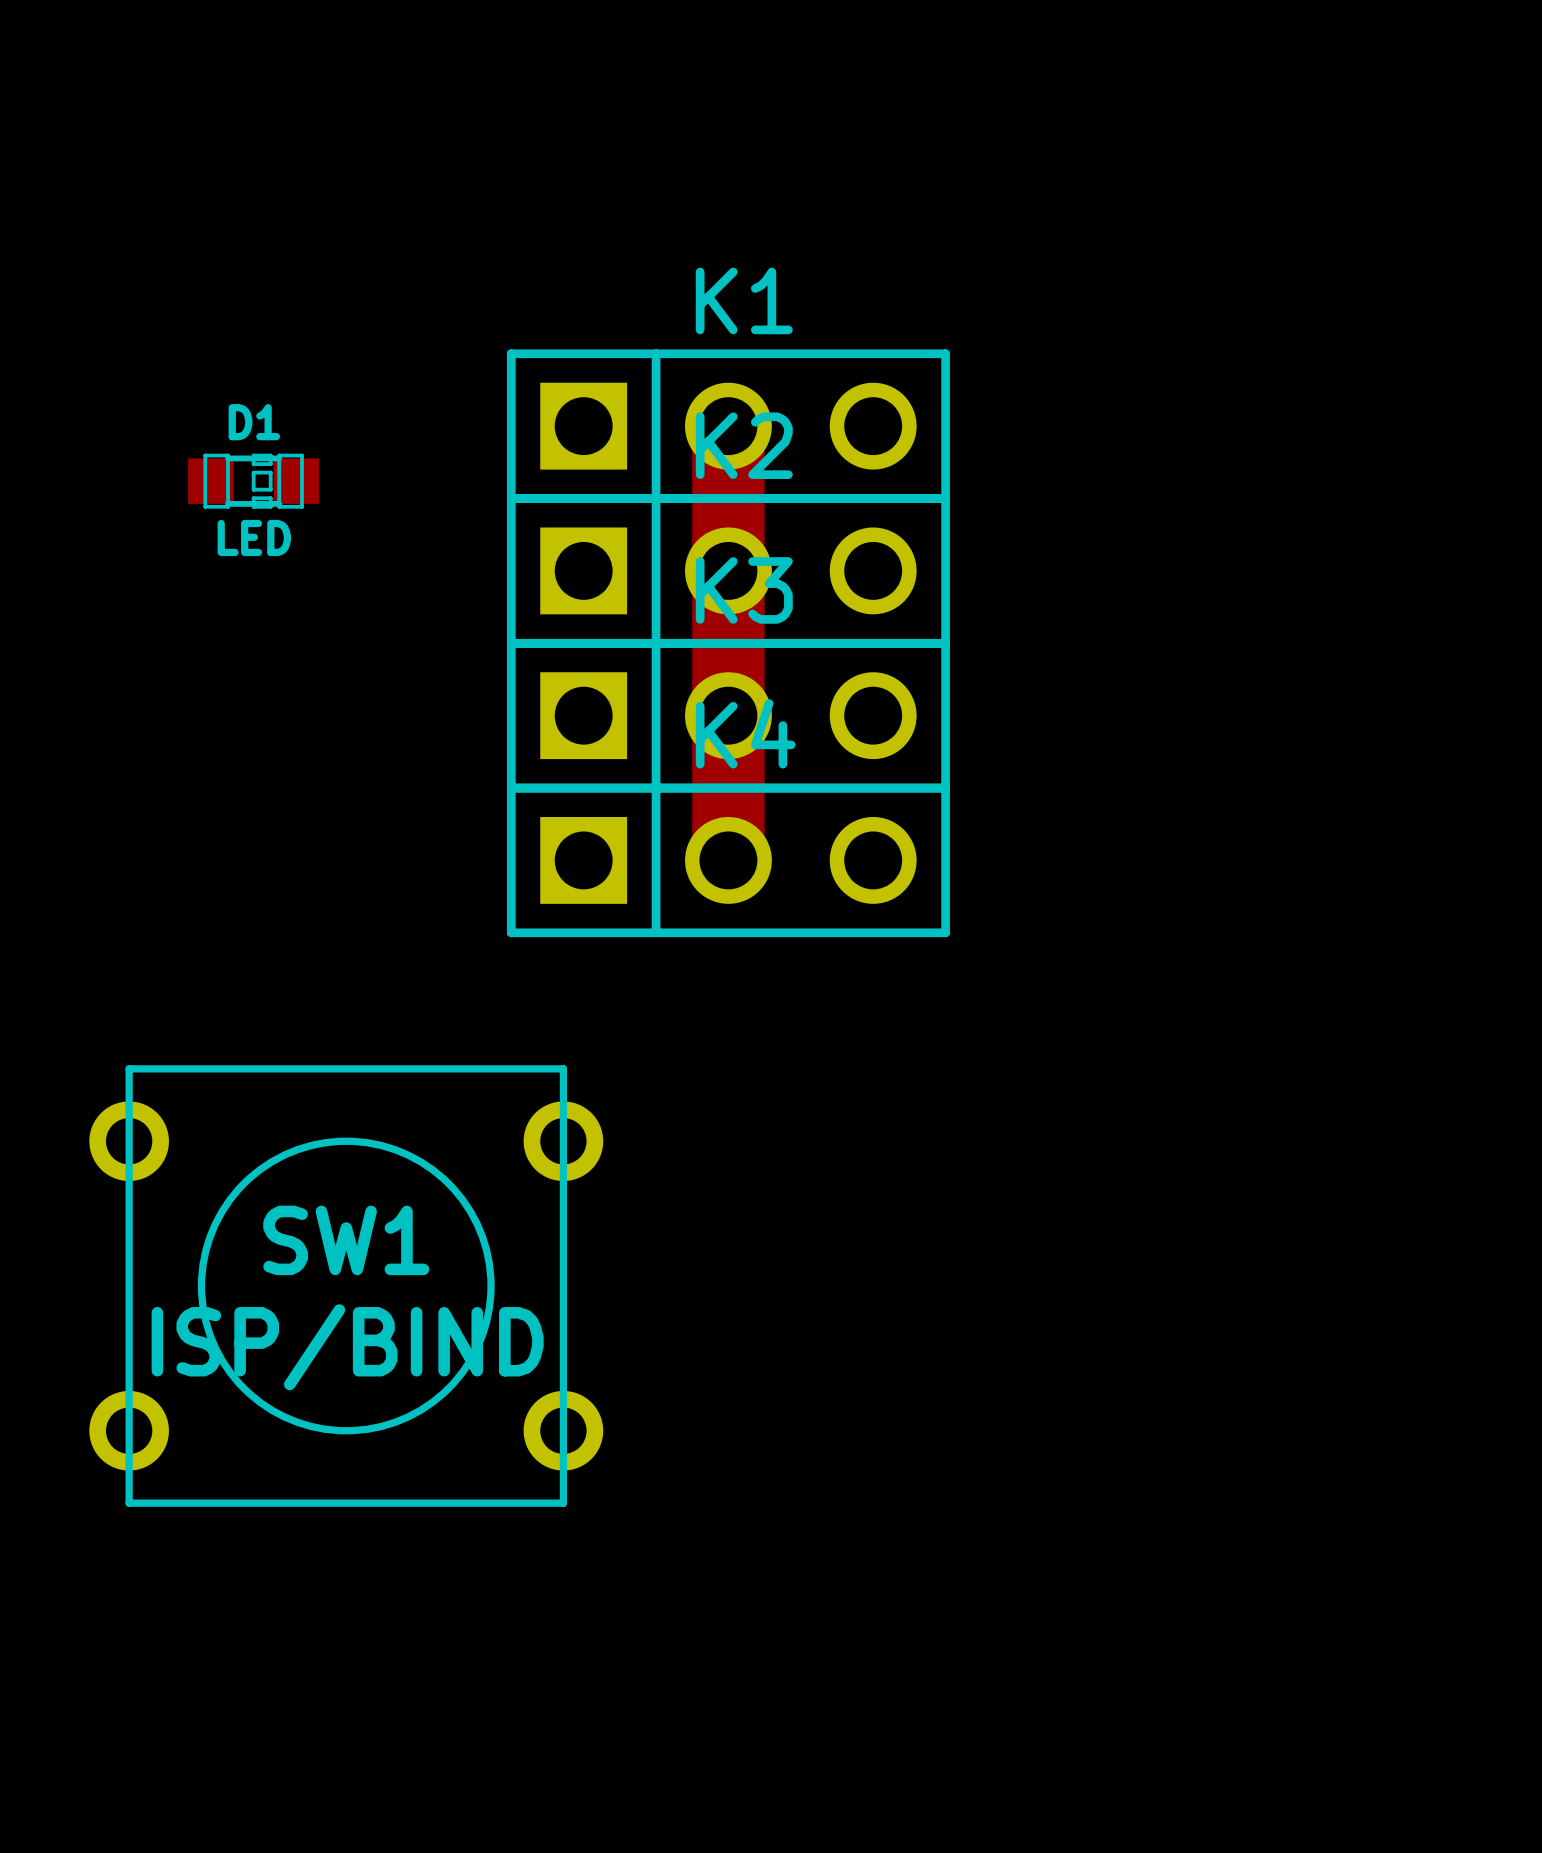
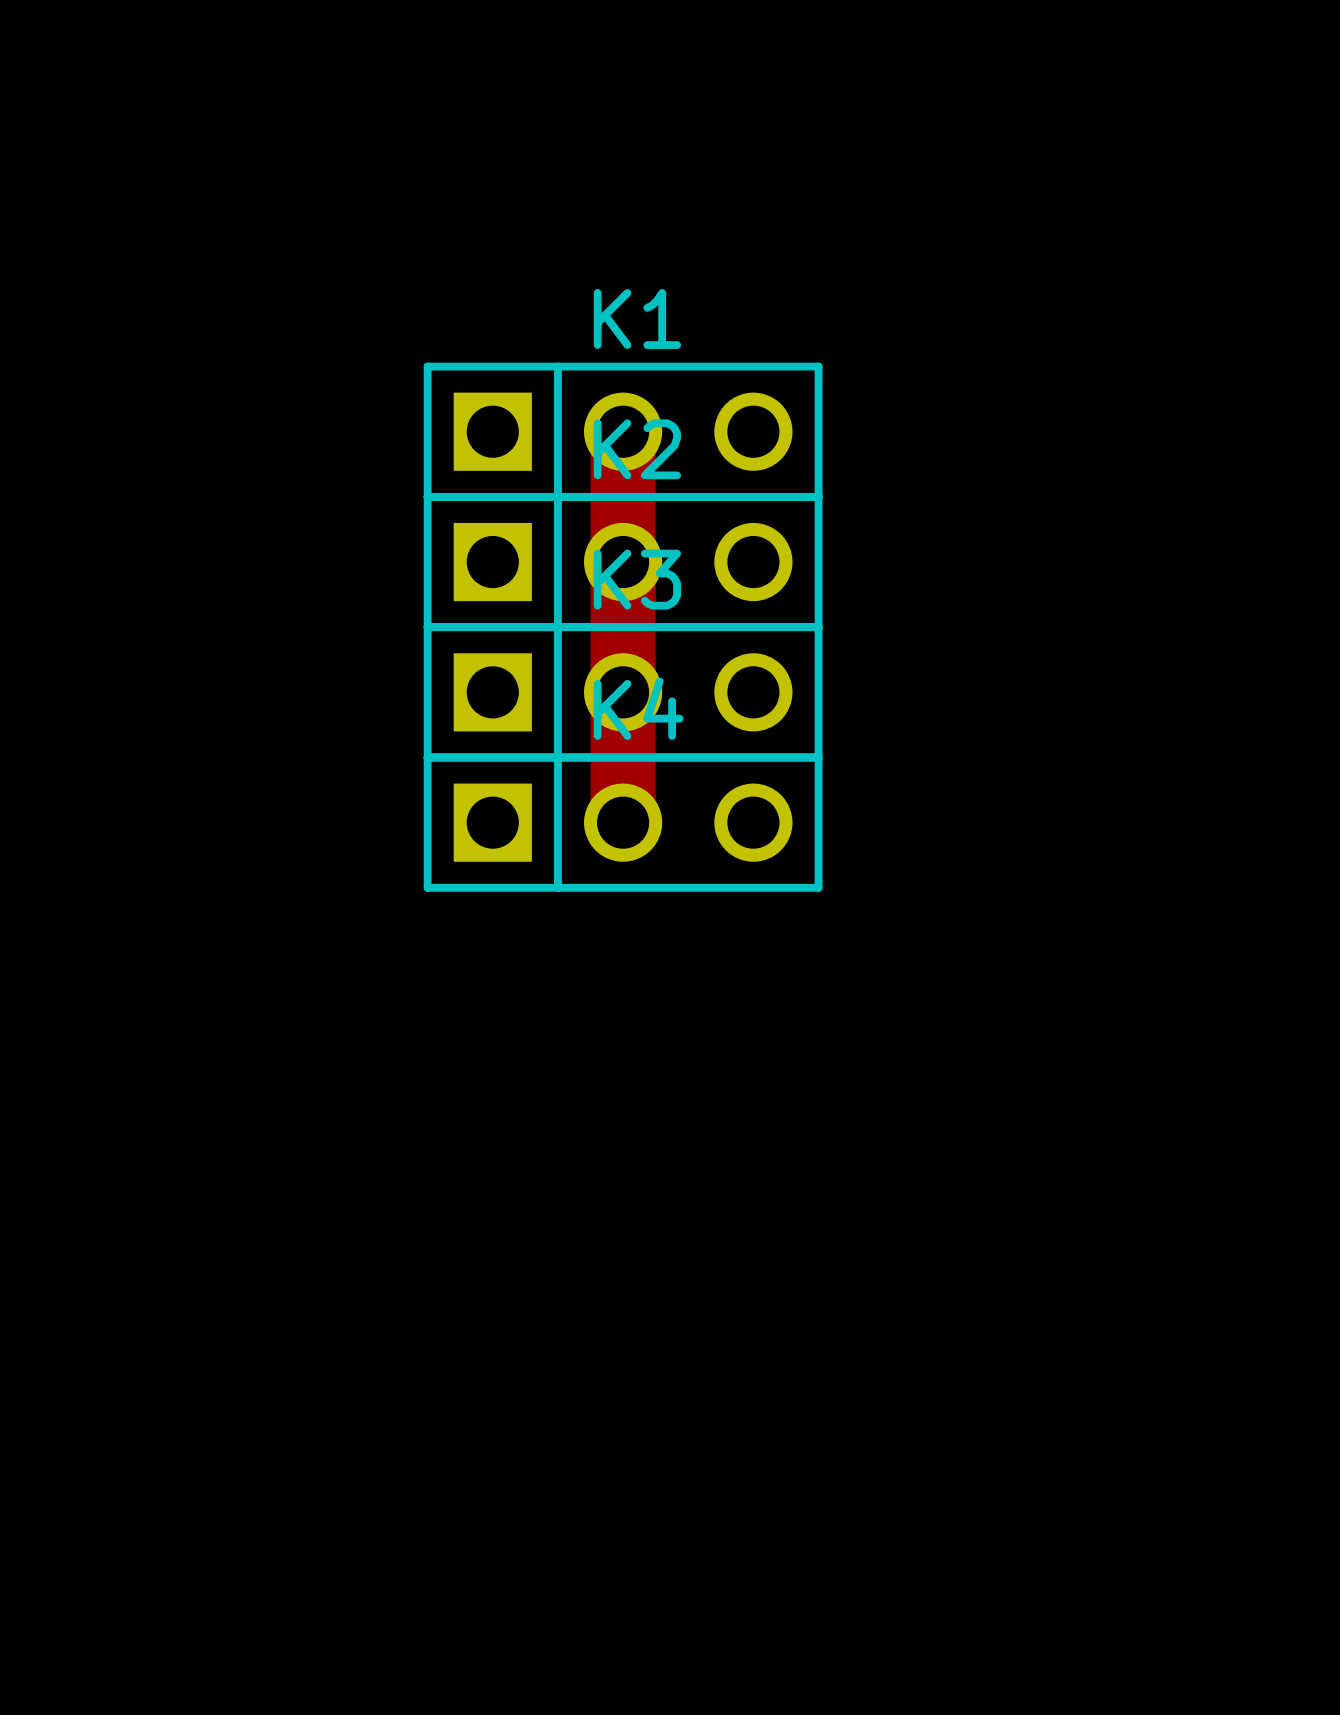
D1: LED (253, 481) -> none
SW1: ISP/BIND (346, 1286) -> none

